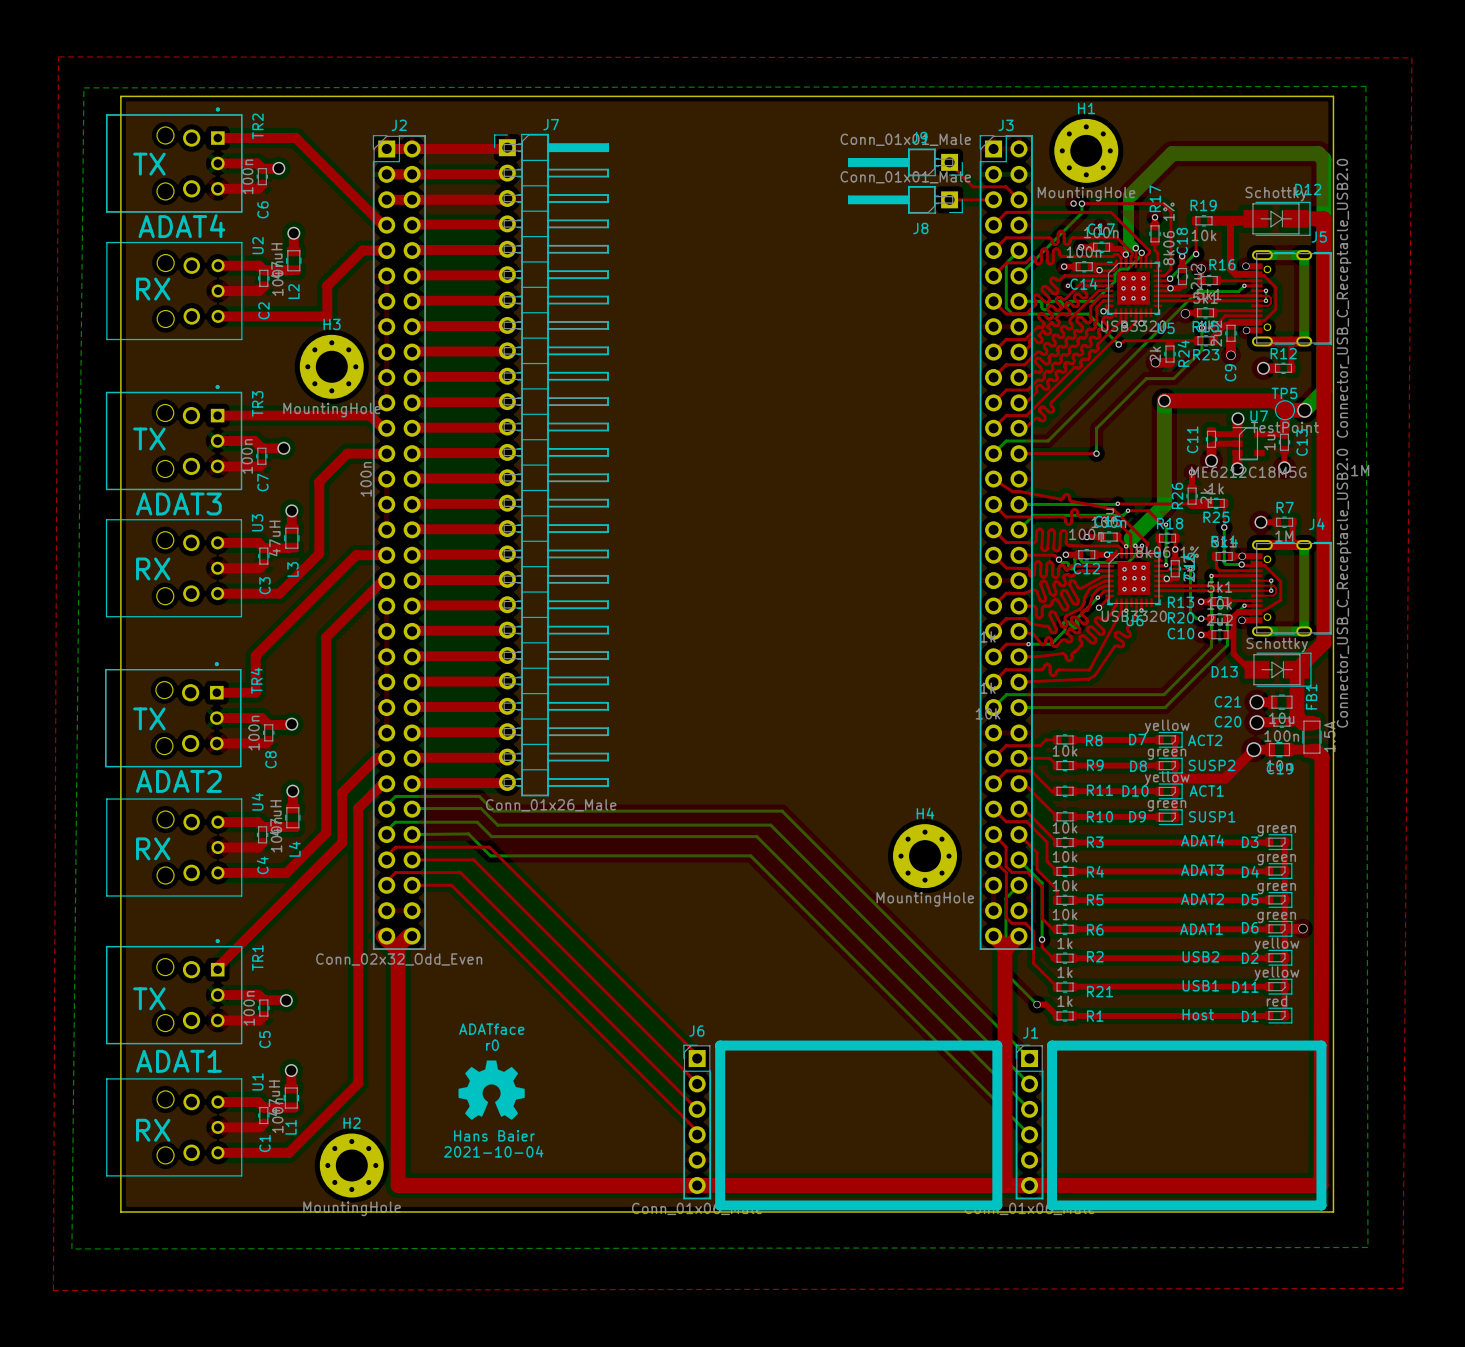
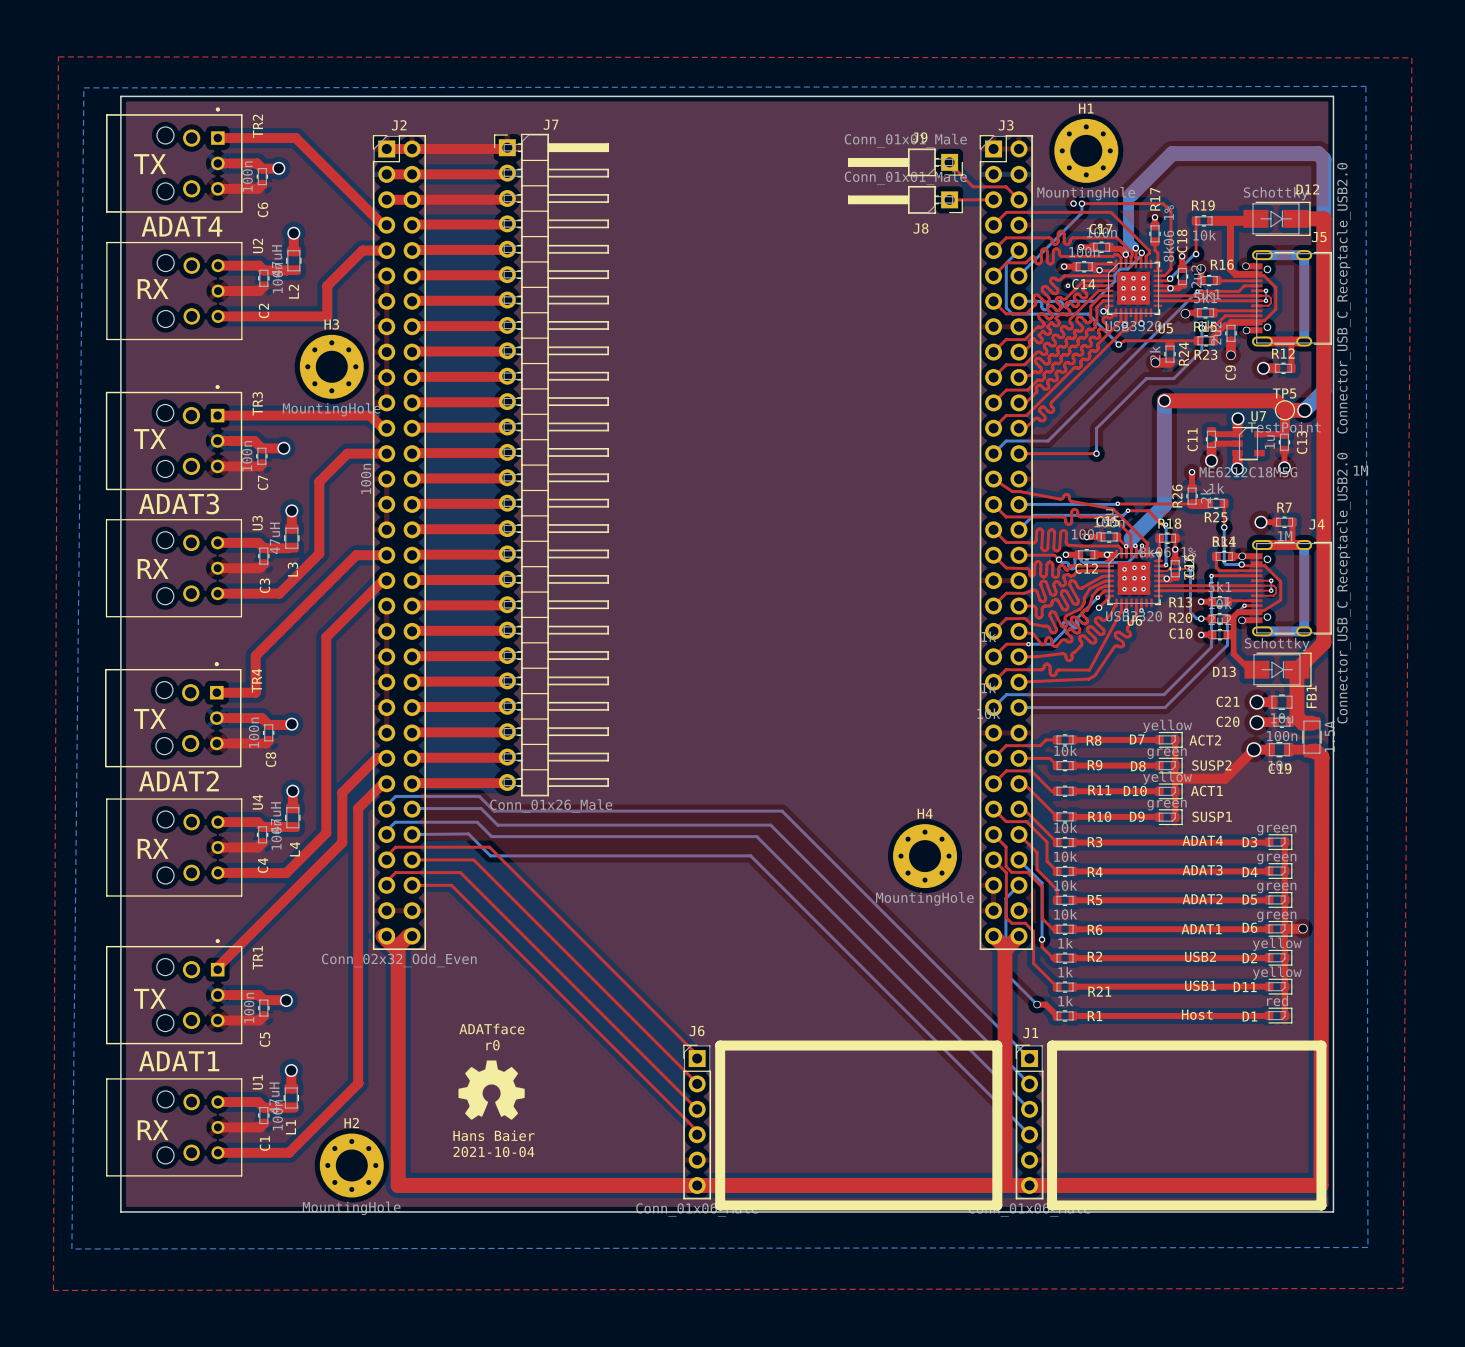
top track: none -> (1244, 285) (1238, 291) (1197, 291)
bottom track: (1244, 285) (1238, 291) (1197, 291) -> none
via position: (1244, 285) -> (1197, 291)

